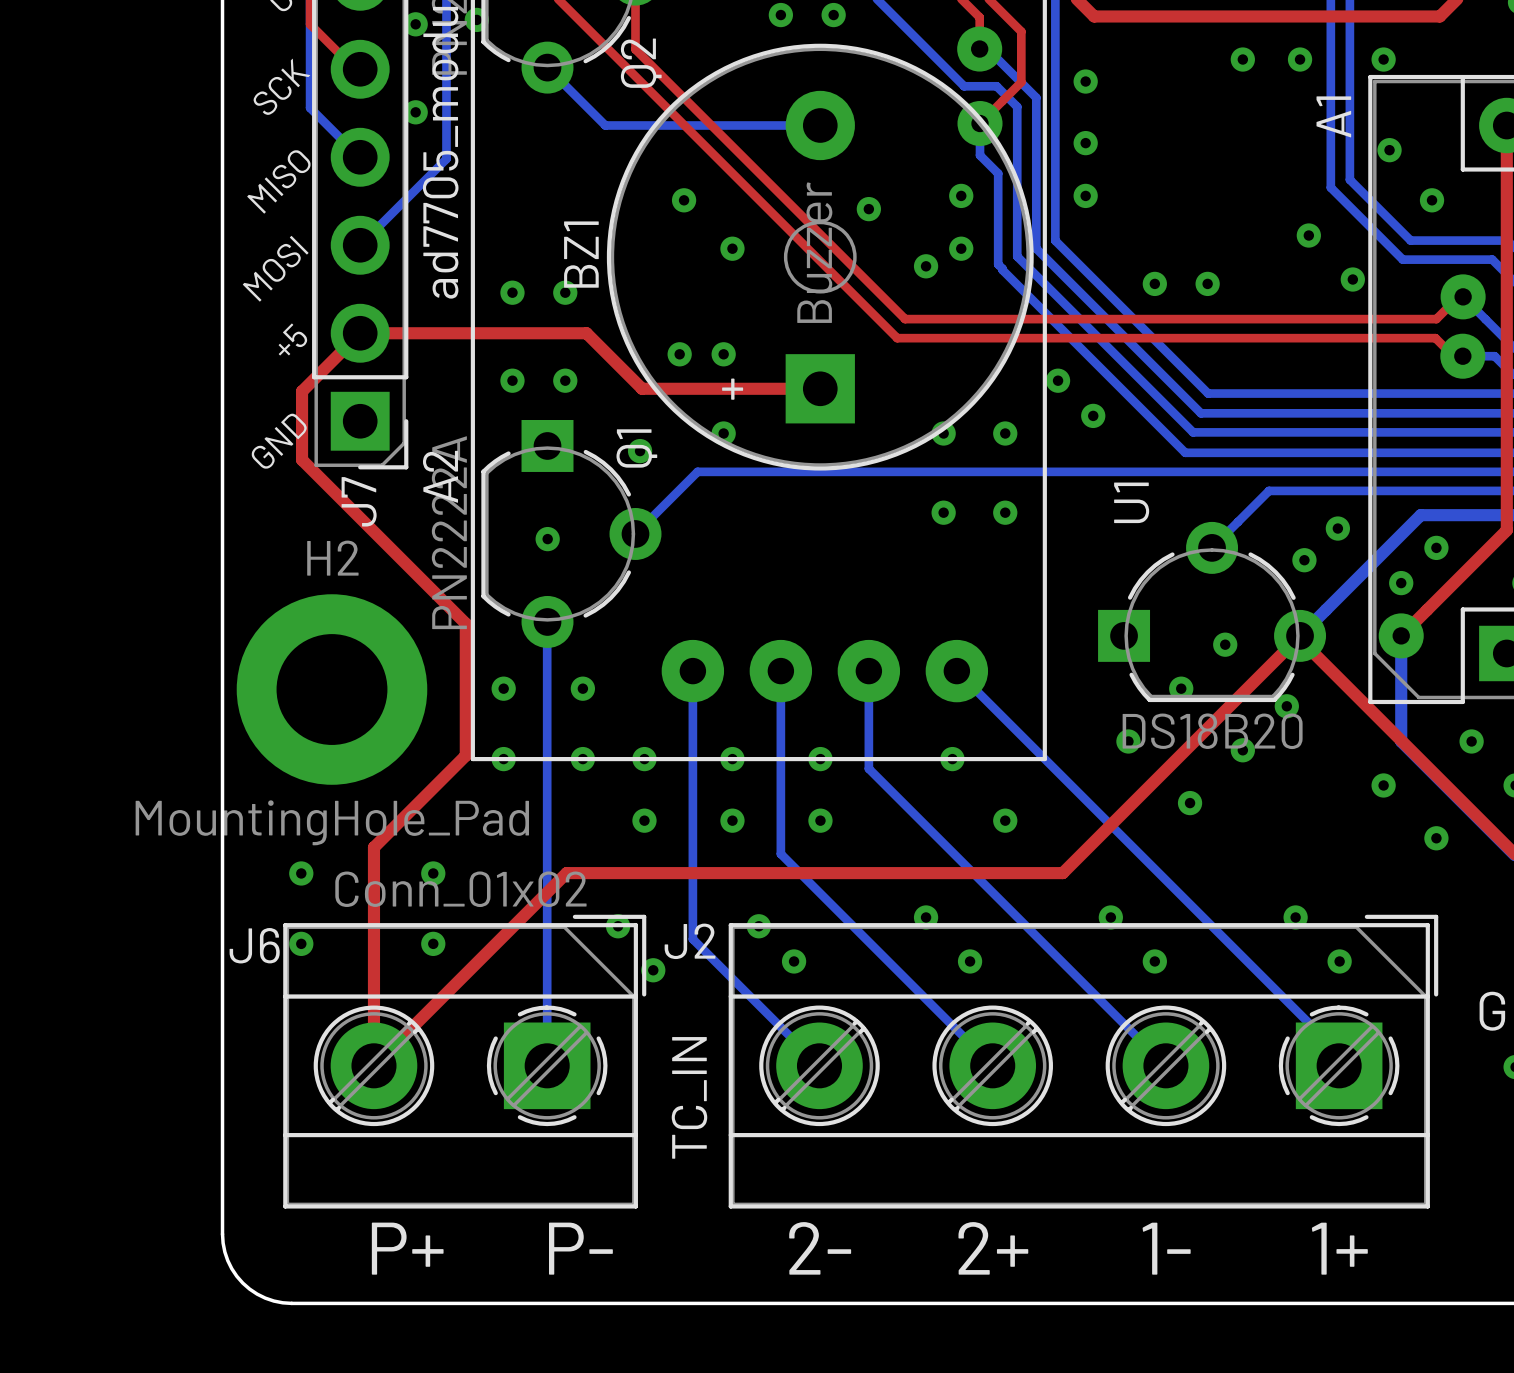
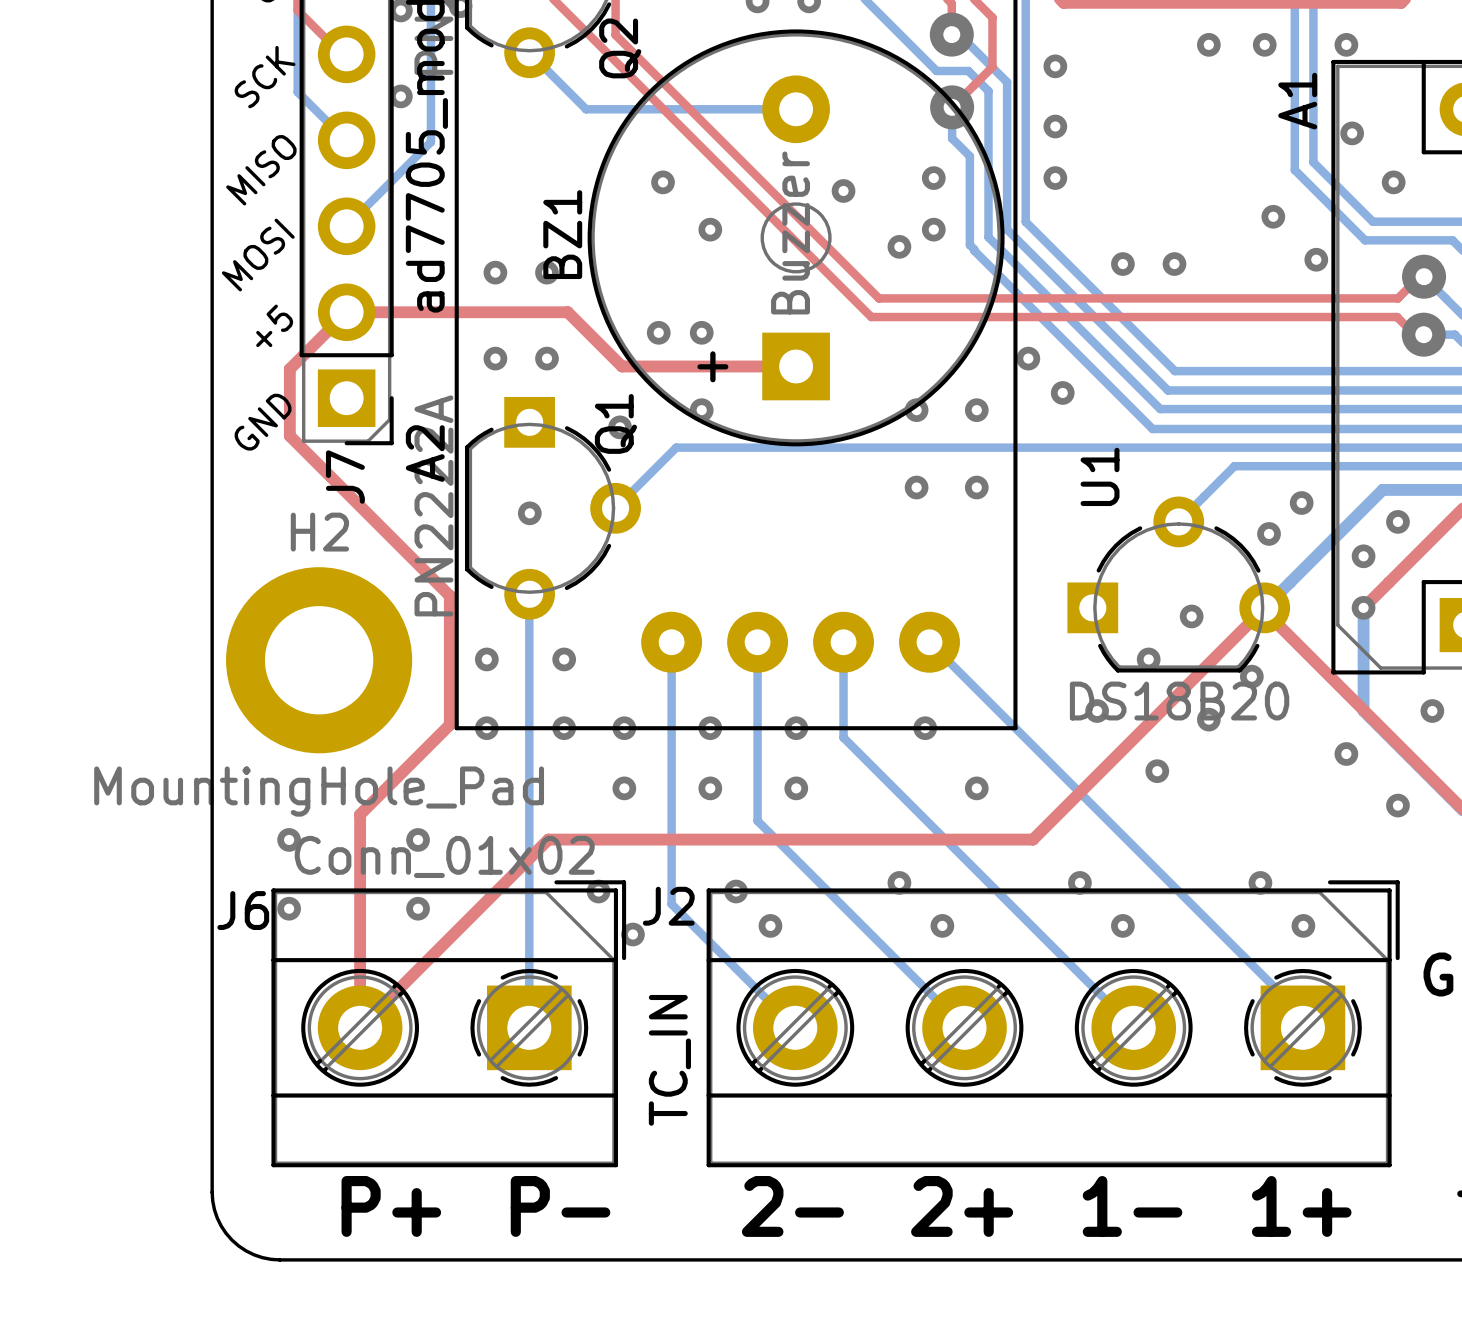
via size: [1378, 613, 1424, 659] -> [1351, 596, 1376, 620]

